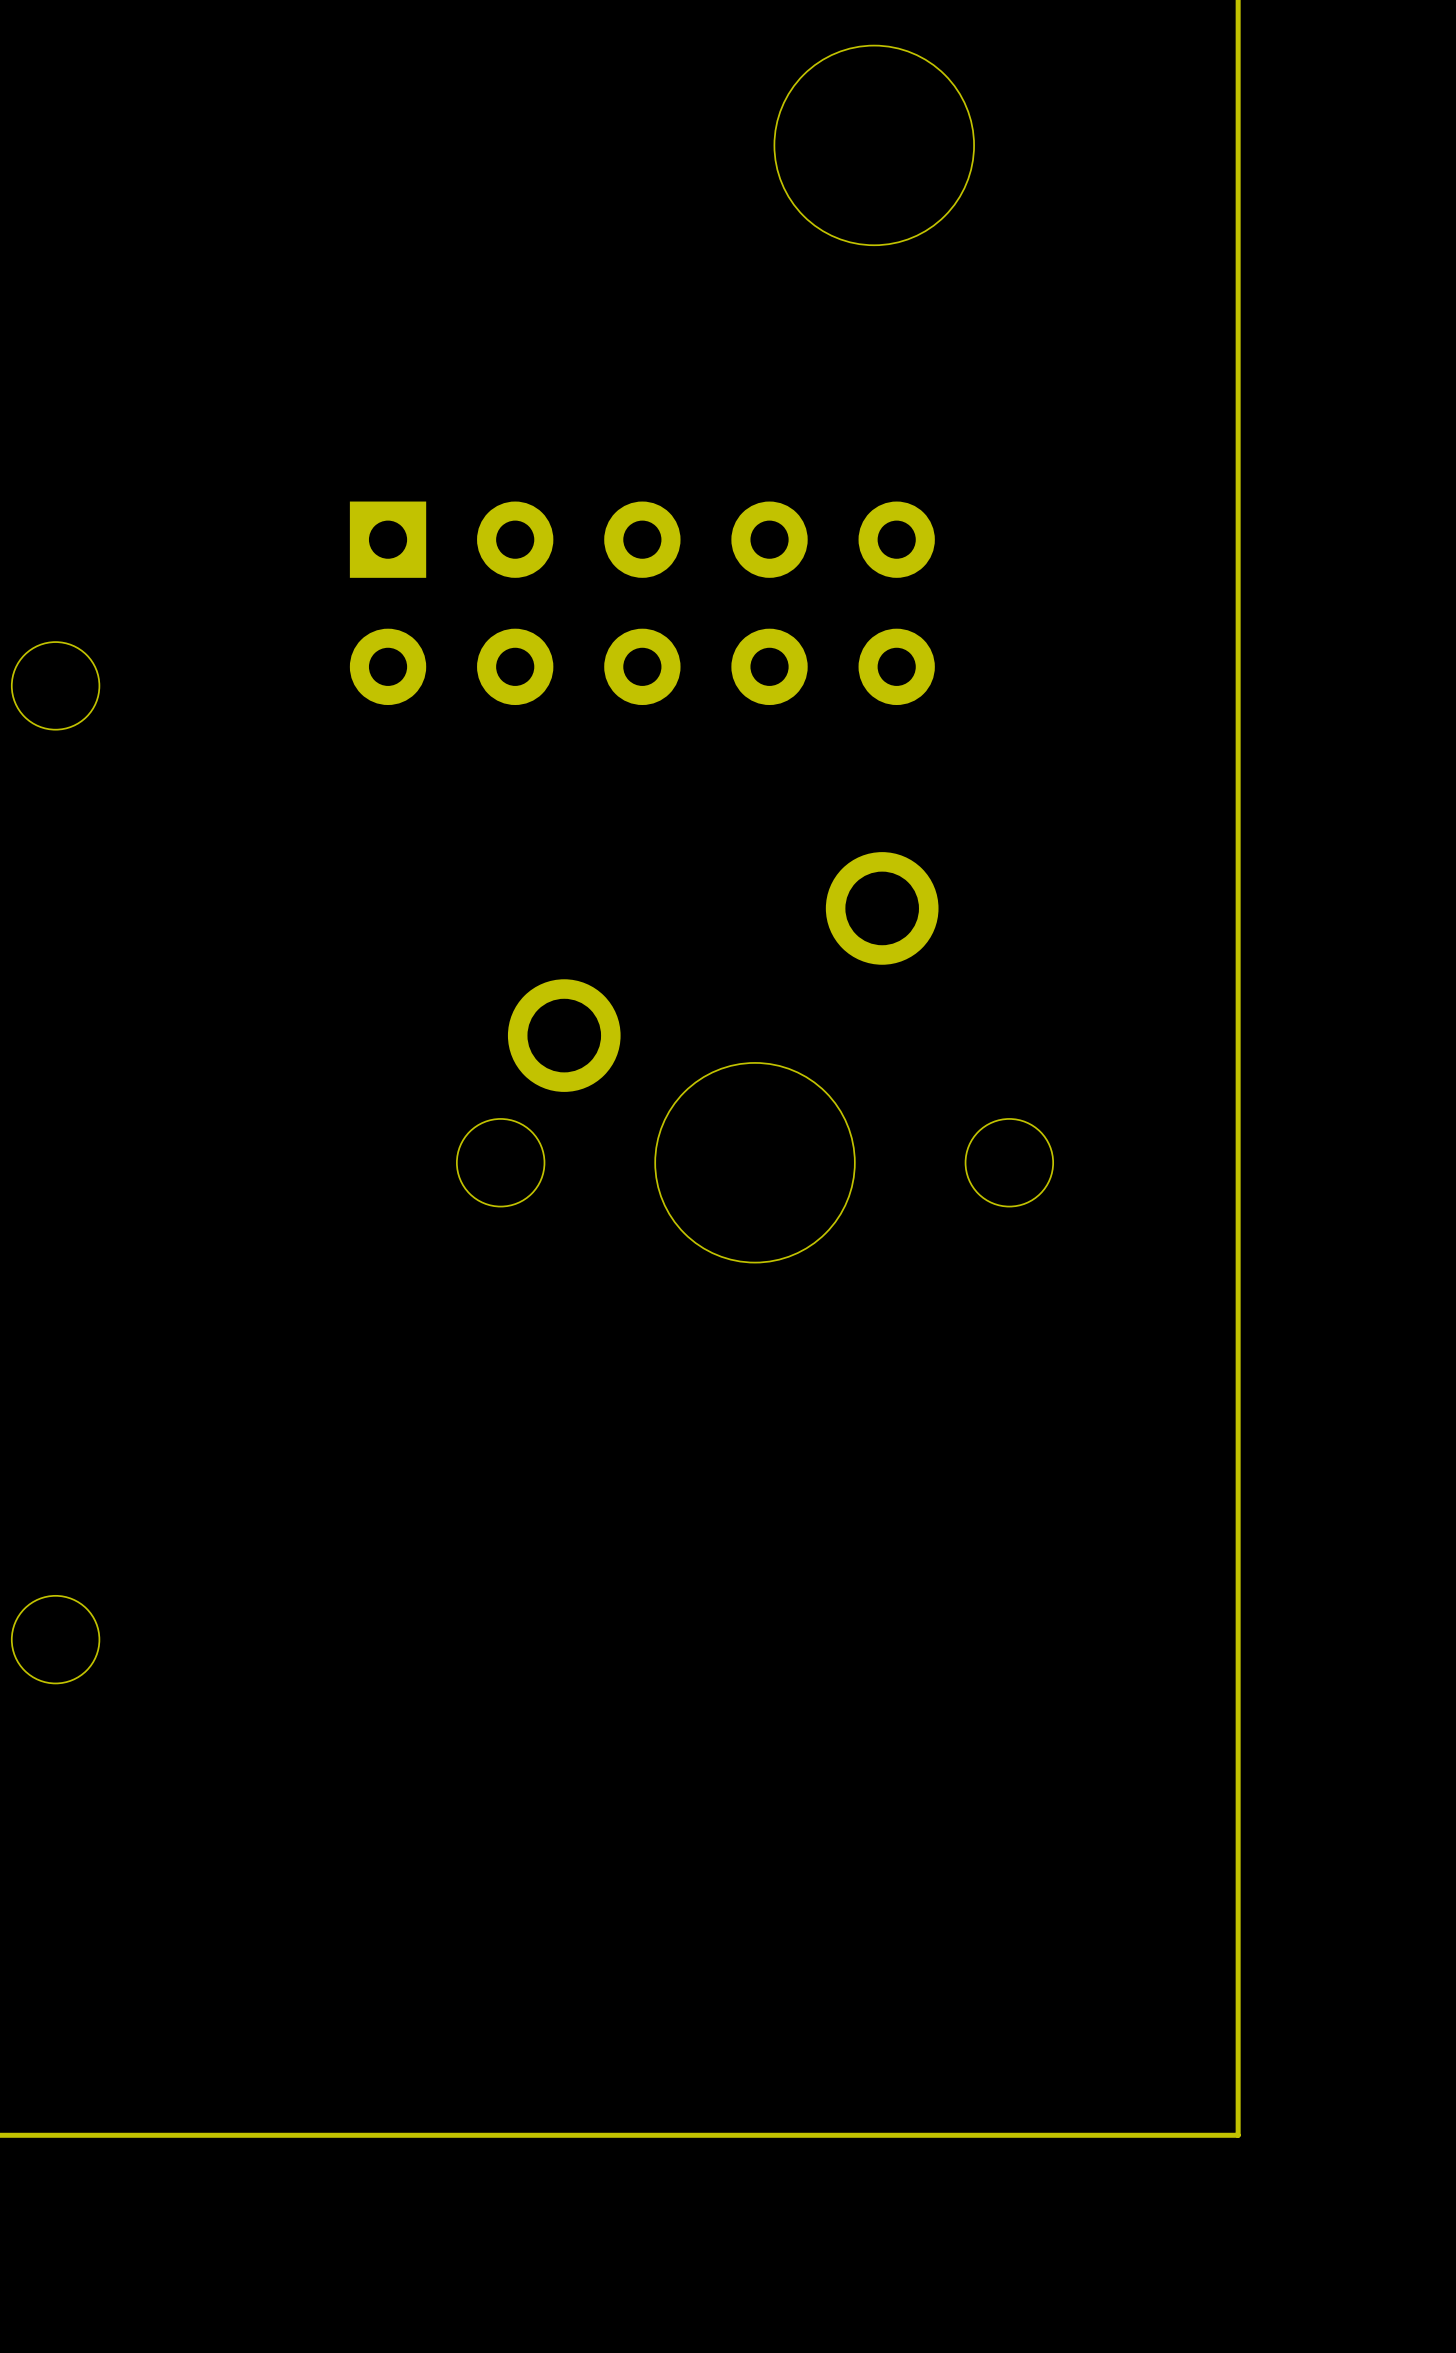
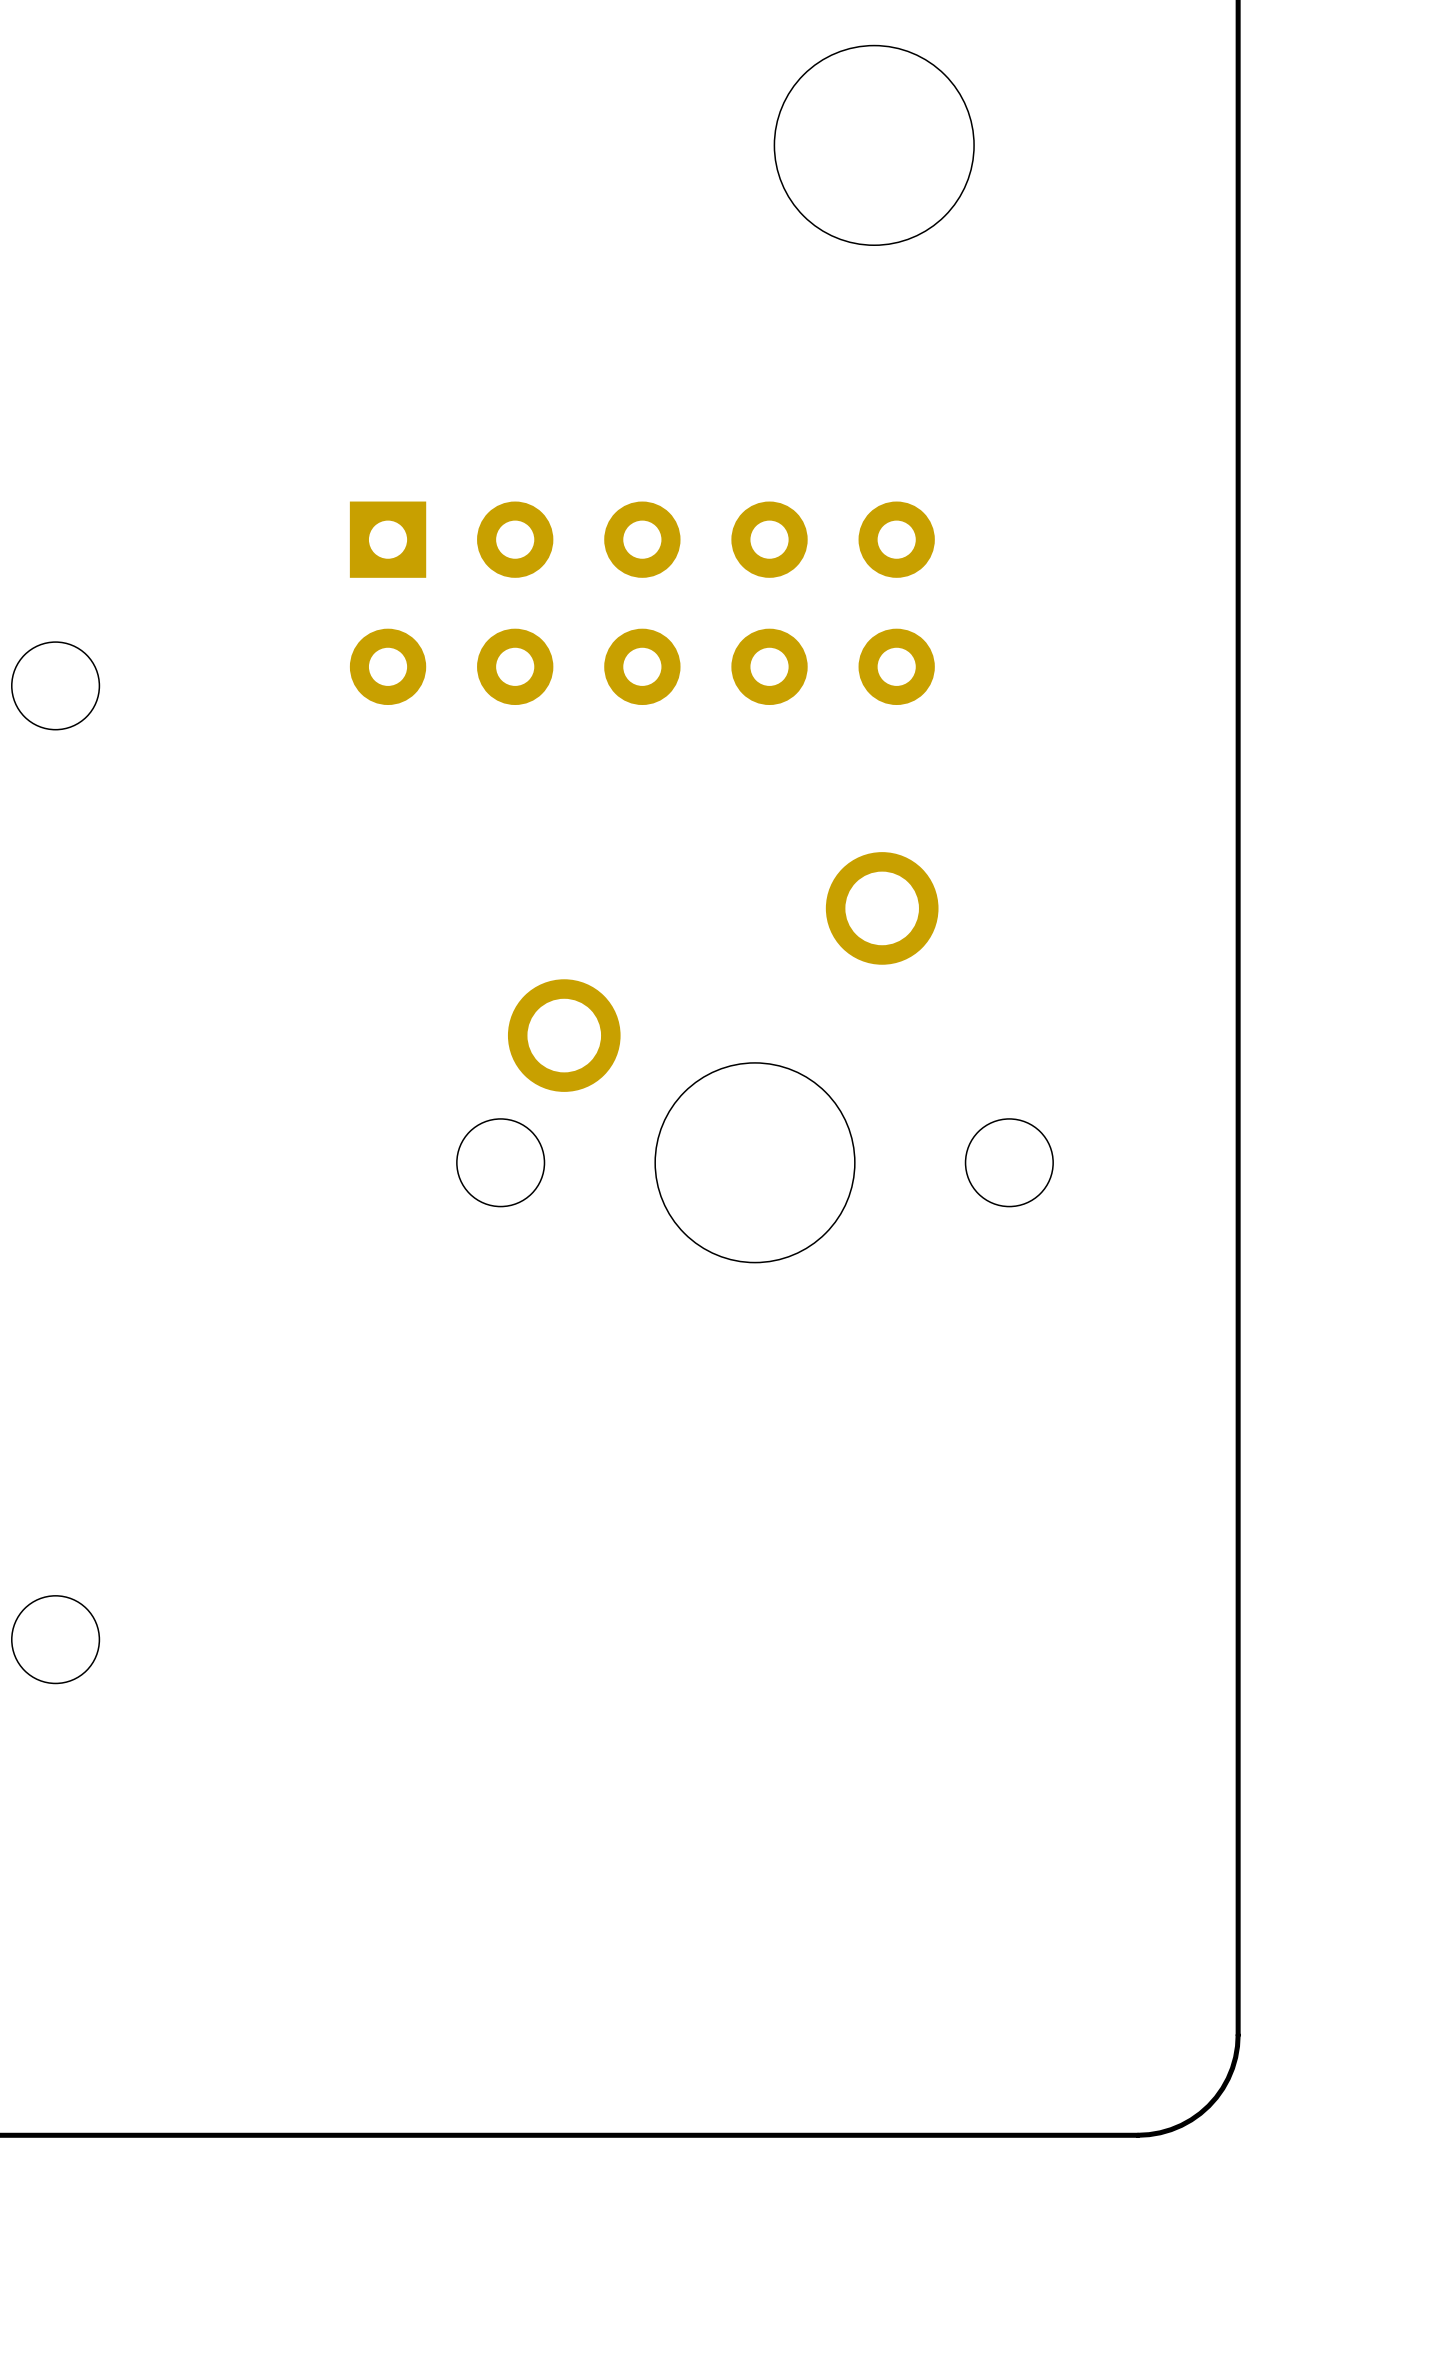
board edge: (1238, 2035) (1238, 2135) (1138, 2135) -> (1238, 2035) (1235, 2057) (1228, 2078) (1208, 2105) (1181, 2125) (1160, 2132) (1138, 2135)

